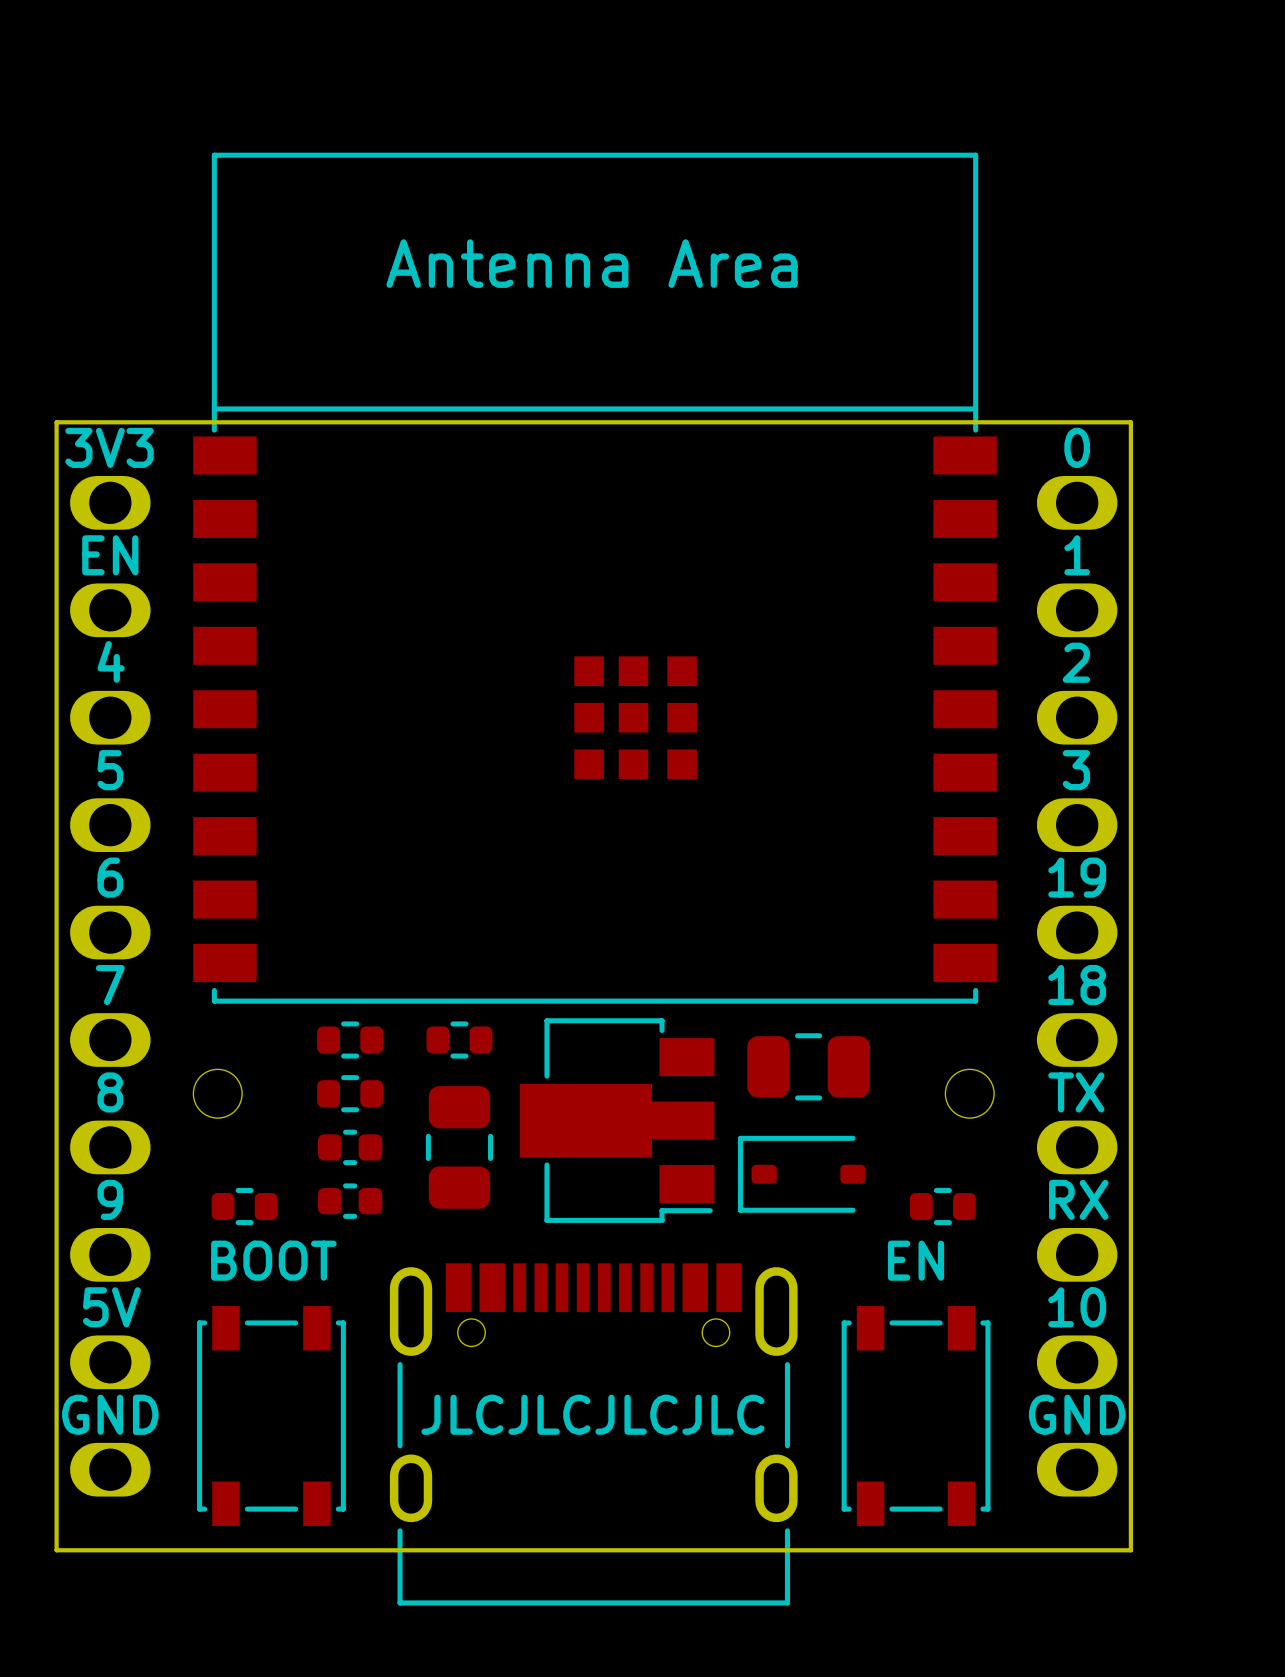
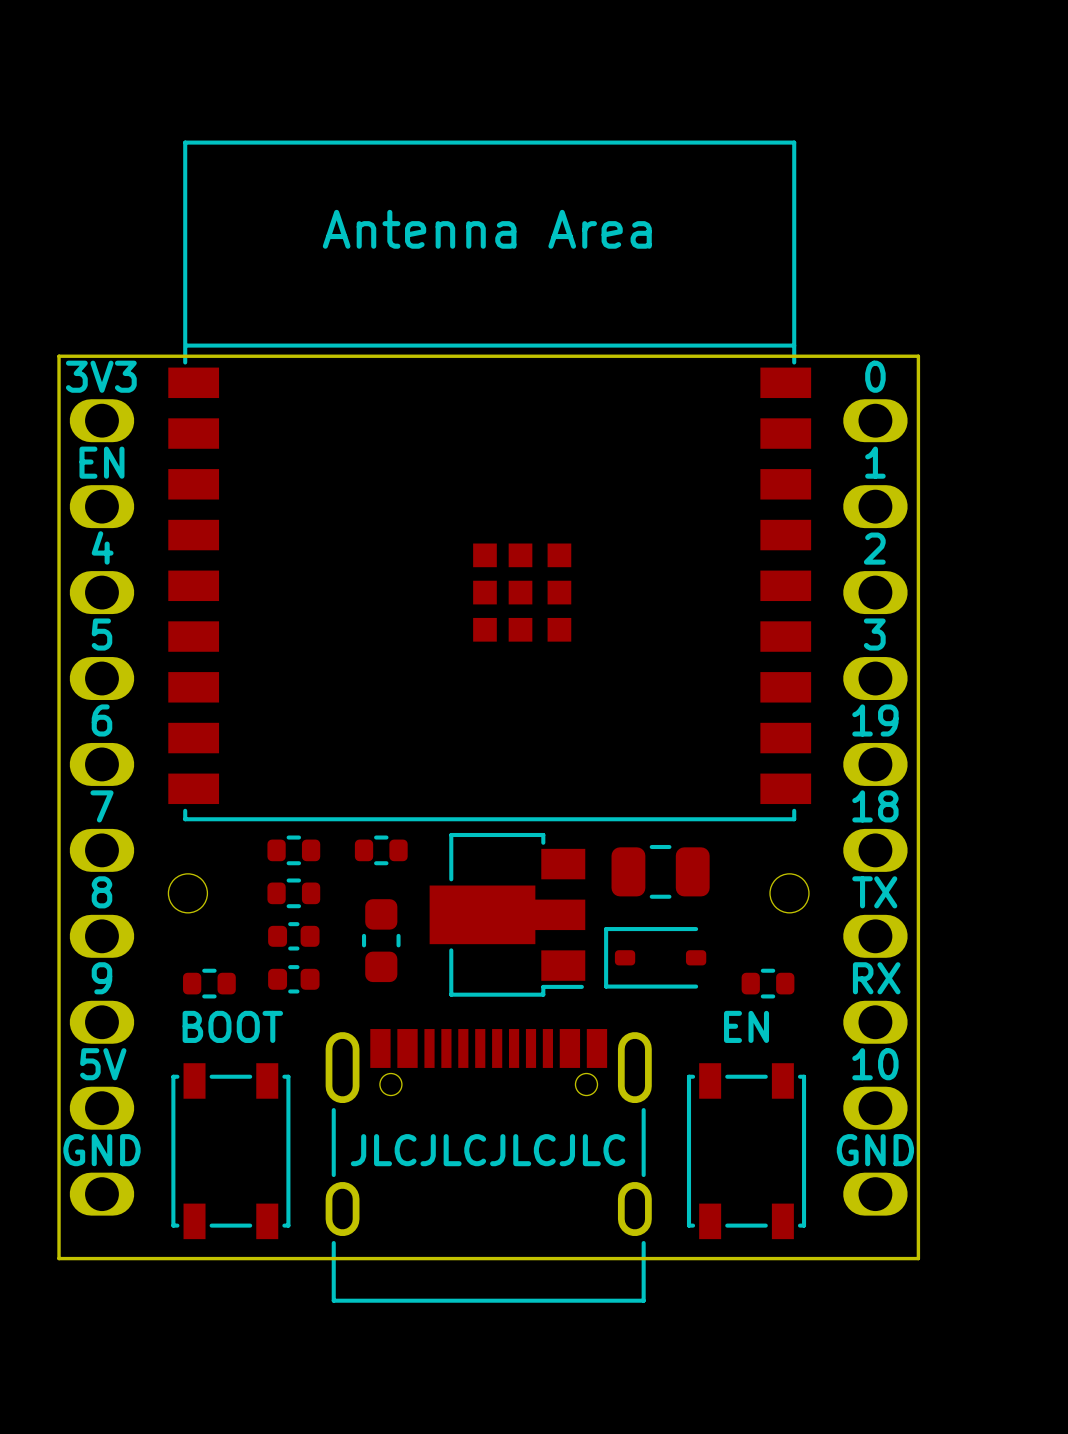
part footprint: [425, 1086, 494, 1209] -> [362, 899, 401, 983]

